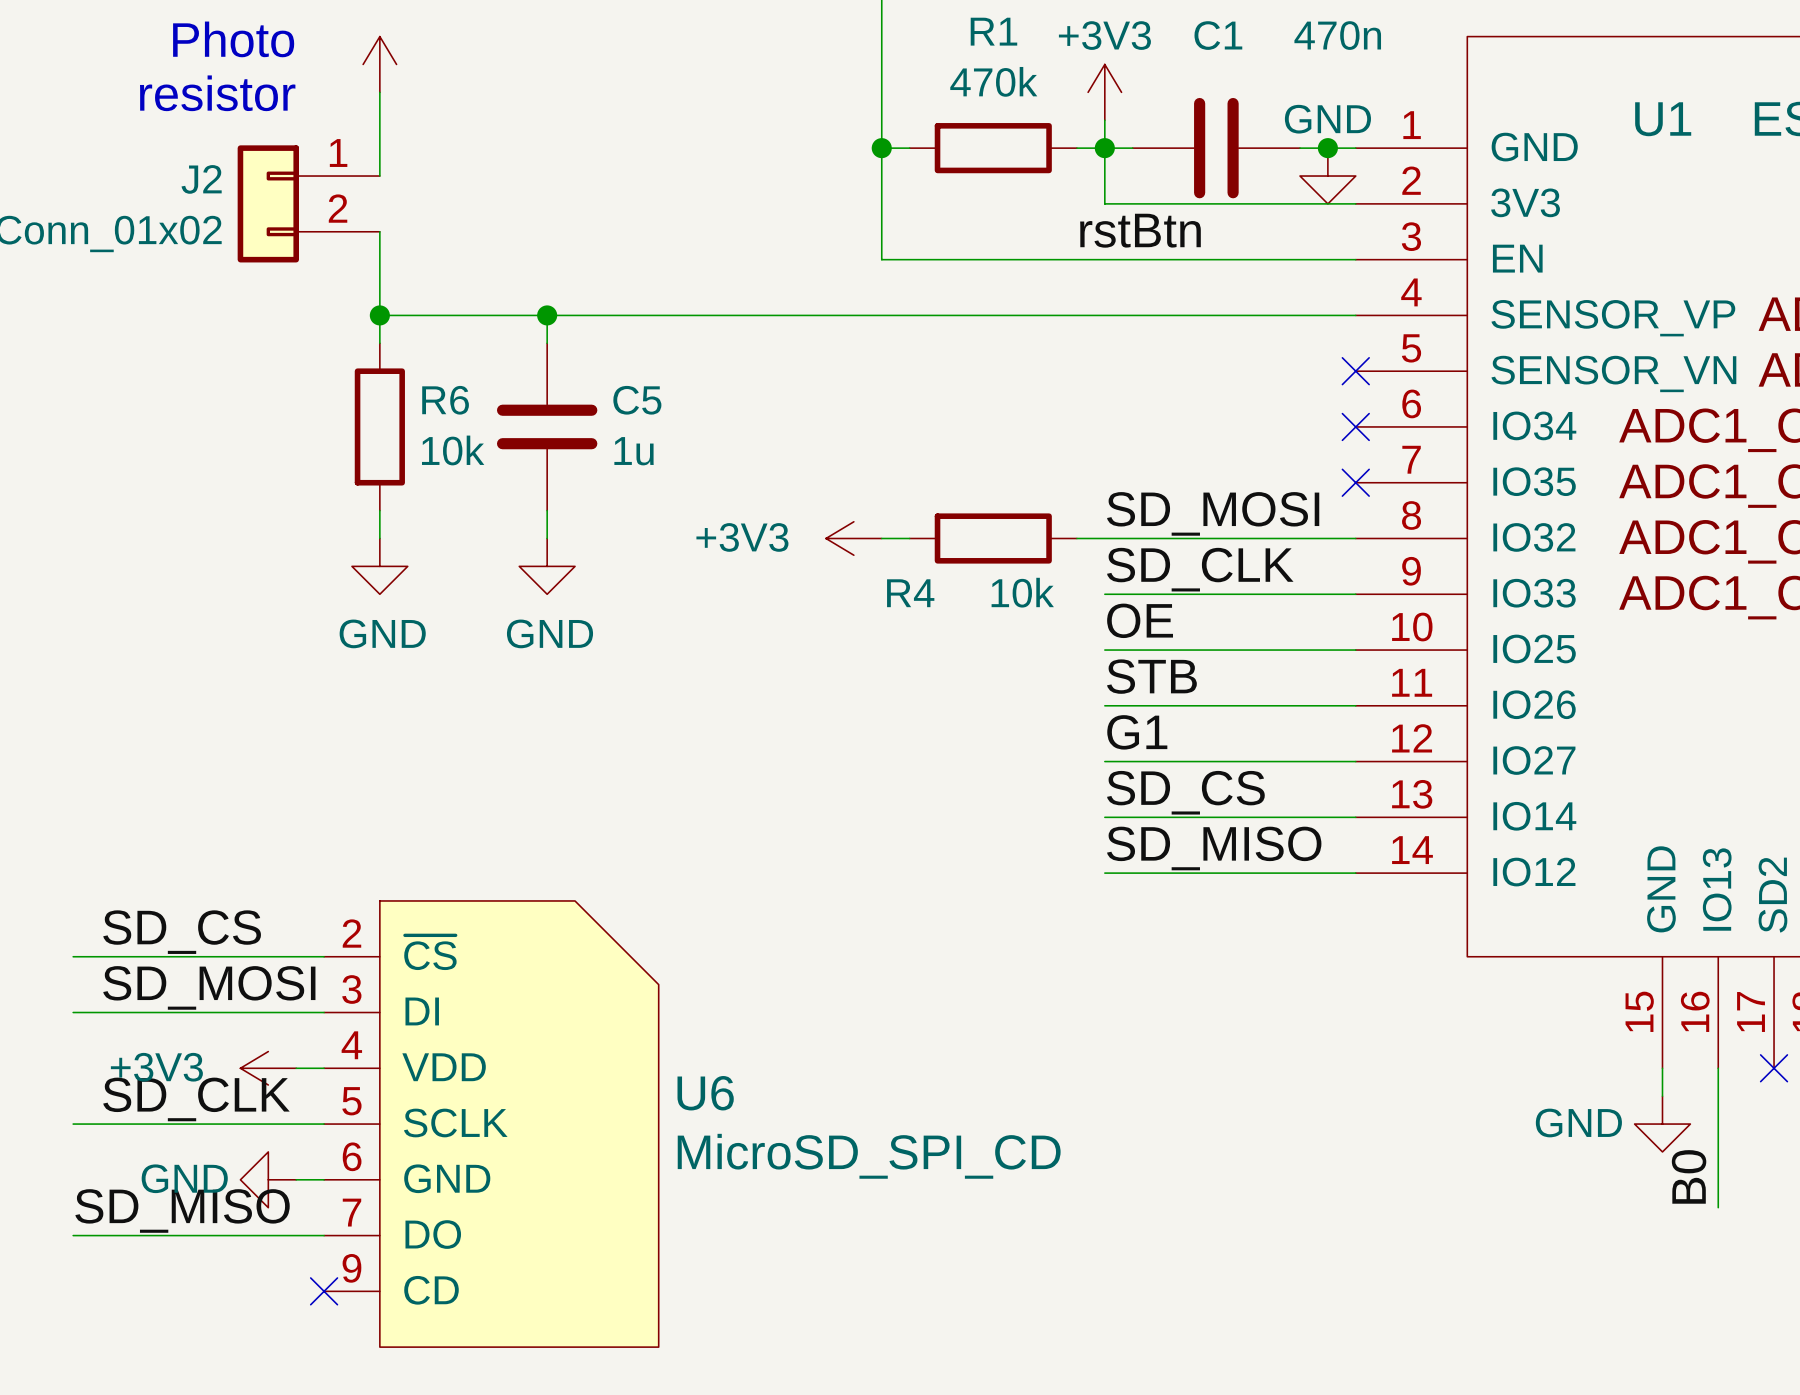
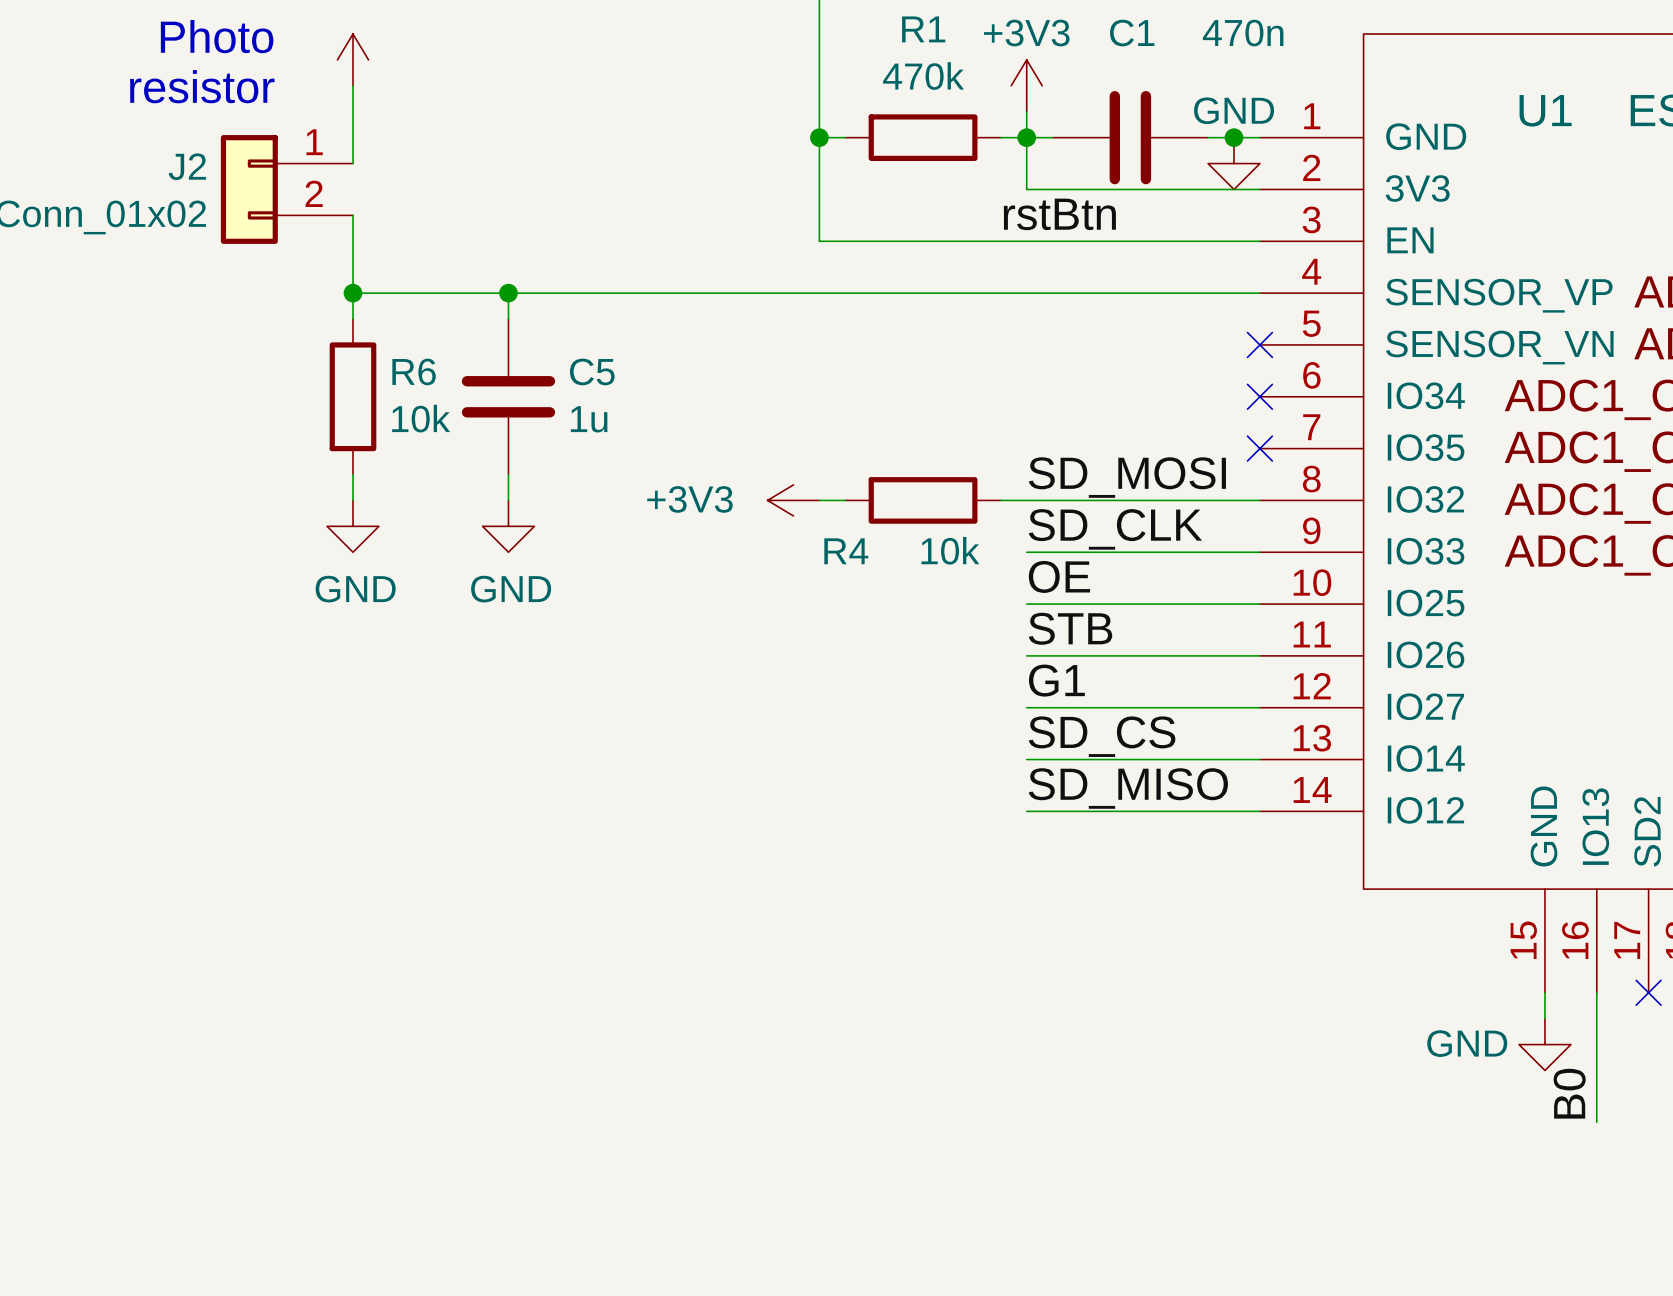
label: SD_CS (182, 932) -> none
wire: (73, 956) (324, 956) -> none
label: SD_MOSI (209, 987) -> none
wire: (73, 1012) (324, 1012) -> none
power symbol: +3V3 (268, 1068) -> none
wire: (296, 1068) (324, 1068) -> none
label: SD_CLK (196, 1099) -> none
wire: (73, 1124) (324, 1124) -> none
U6: MicroSD_SPI_CD (491, 1124) -> none
power symbol: GND (268, 1179) -> none
wire: (296, 1179) (324, 1179) -> none
label: SD_MISO (182, 1210) -> none
wire: (73, 1235) (324, 1235) -> none
no-connect mark: (324, 1291) -> none

